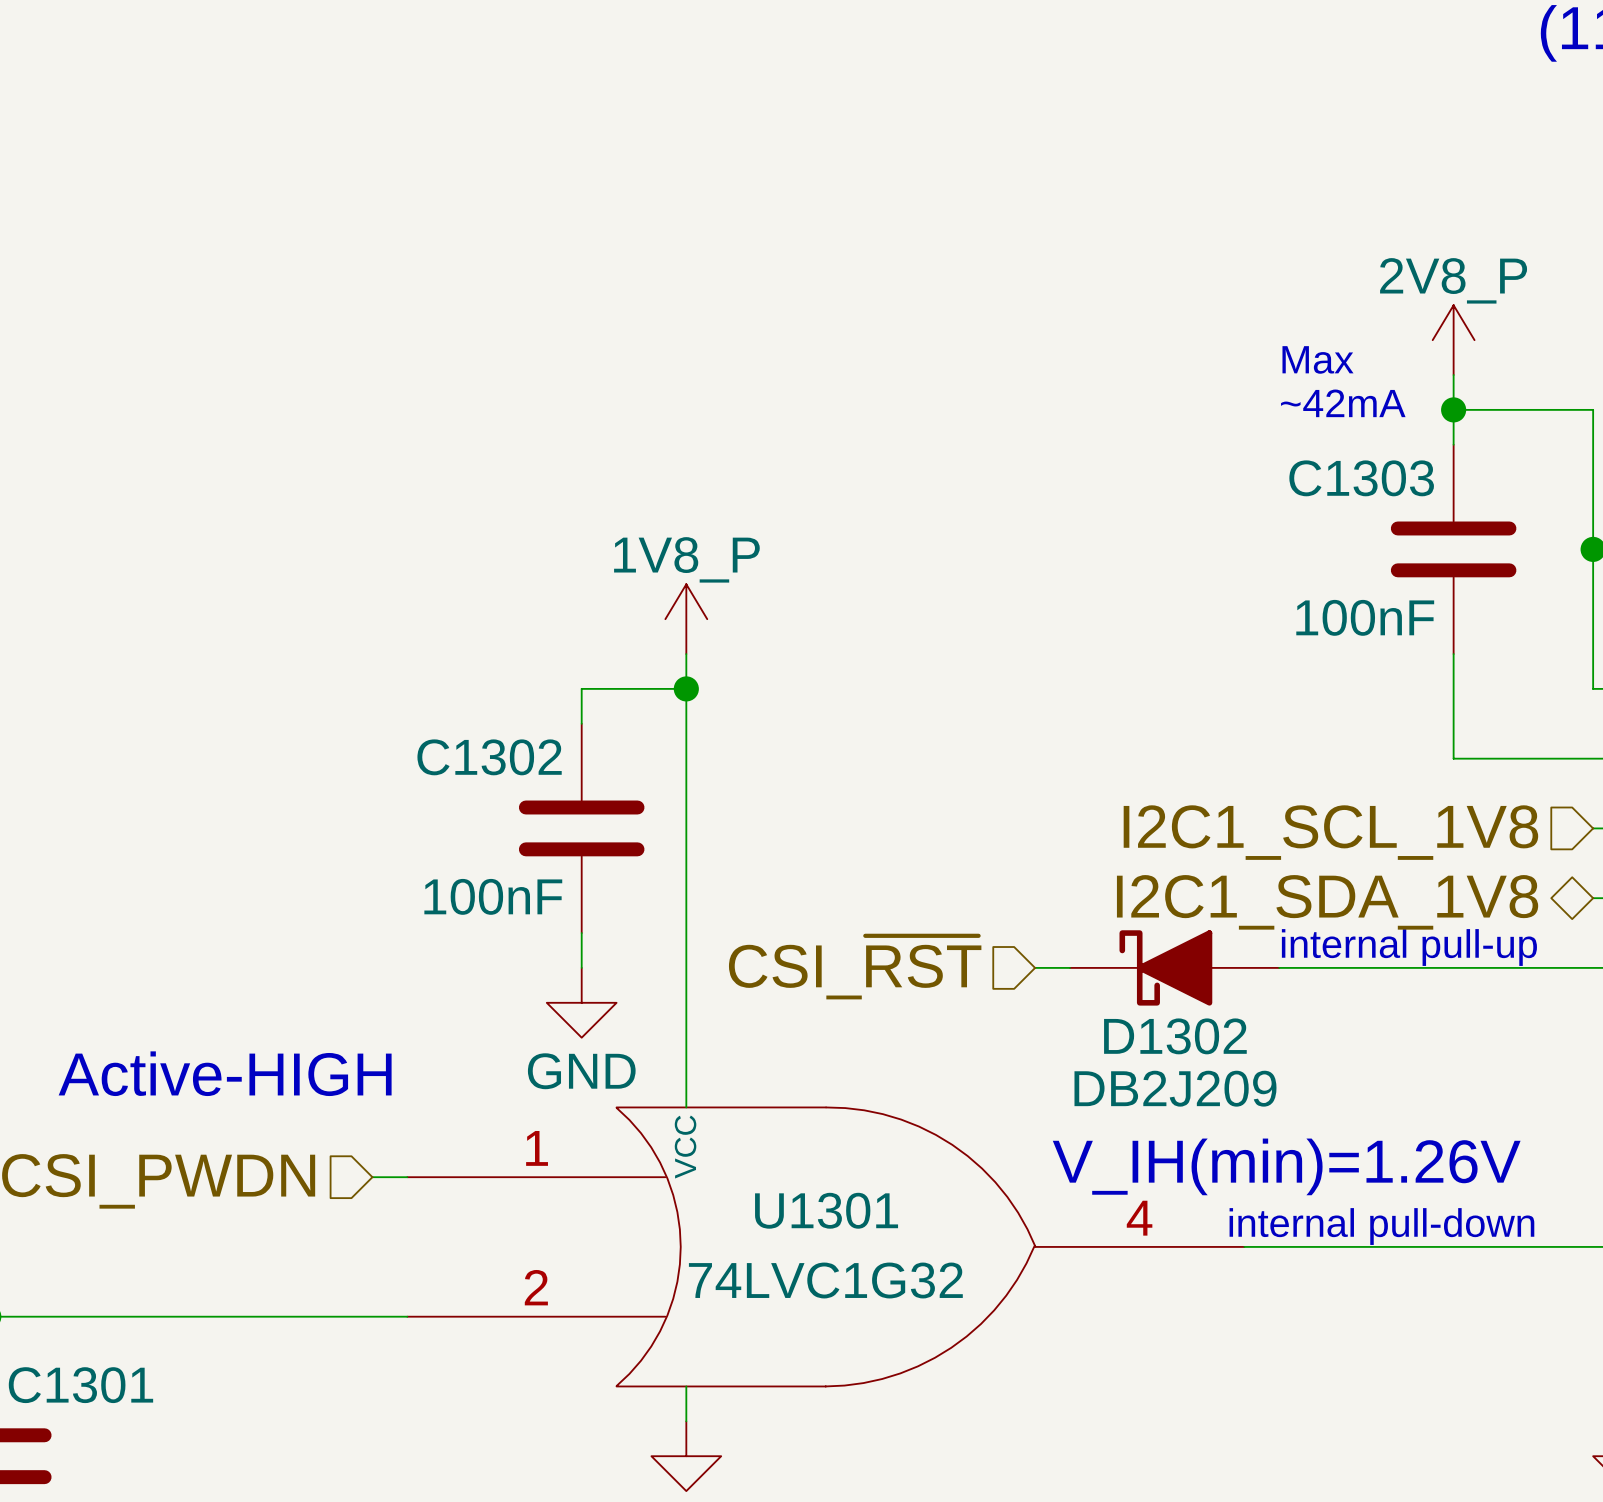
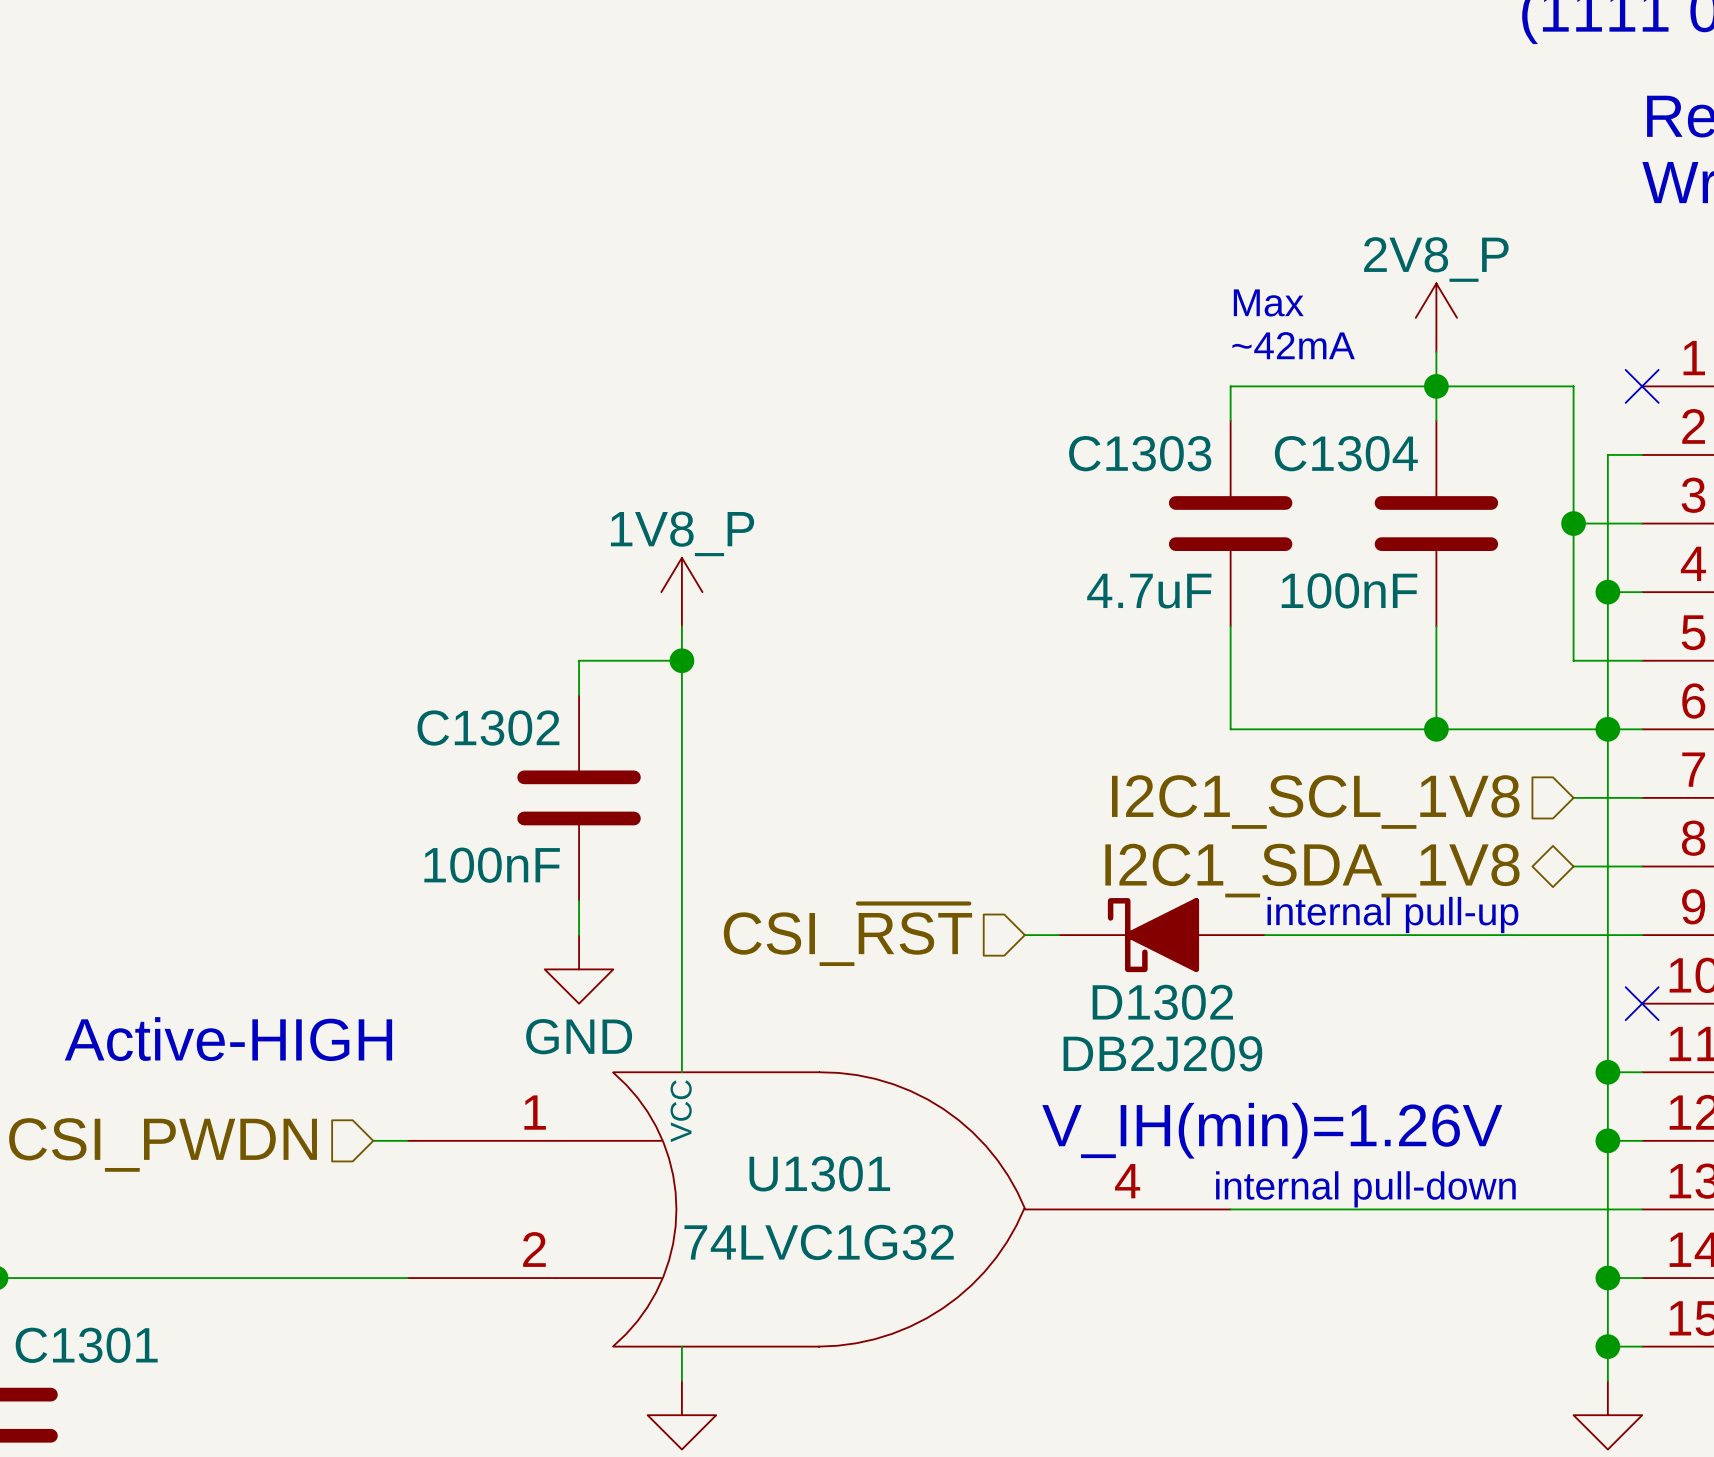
text position: Max (1318, 359) -> Max (1268, 302)
text position: ~42mA (1343, 403) -> ~42mA (1293, 345)
wire: none -> (1436, 386) (1230, 386) (1230, 420)
C1303 name: C1303 (1361, 478) -> C1304 (1346, 453)
C1303: none -> 4.7uF (1230, 523)
wire: none -> (1230, 626) (1230, 729) (1436, 729)
junction: none -> (1436, 729)

